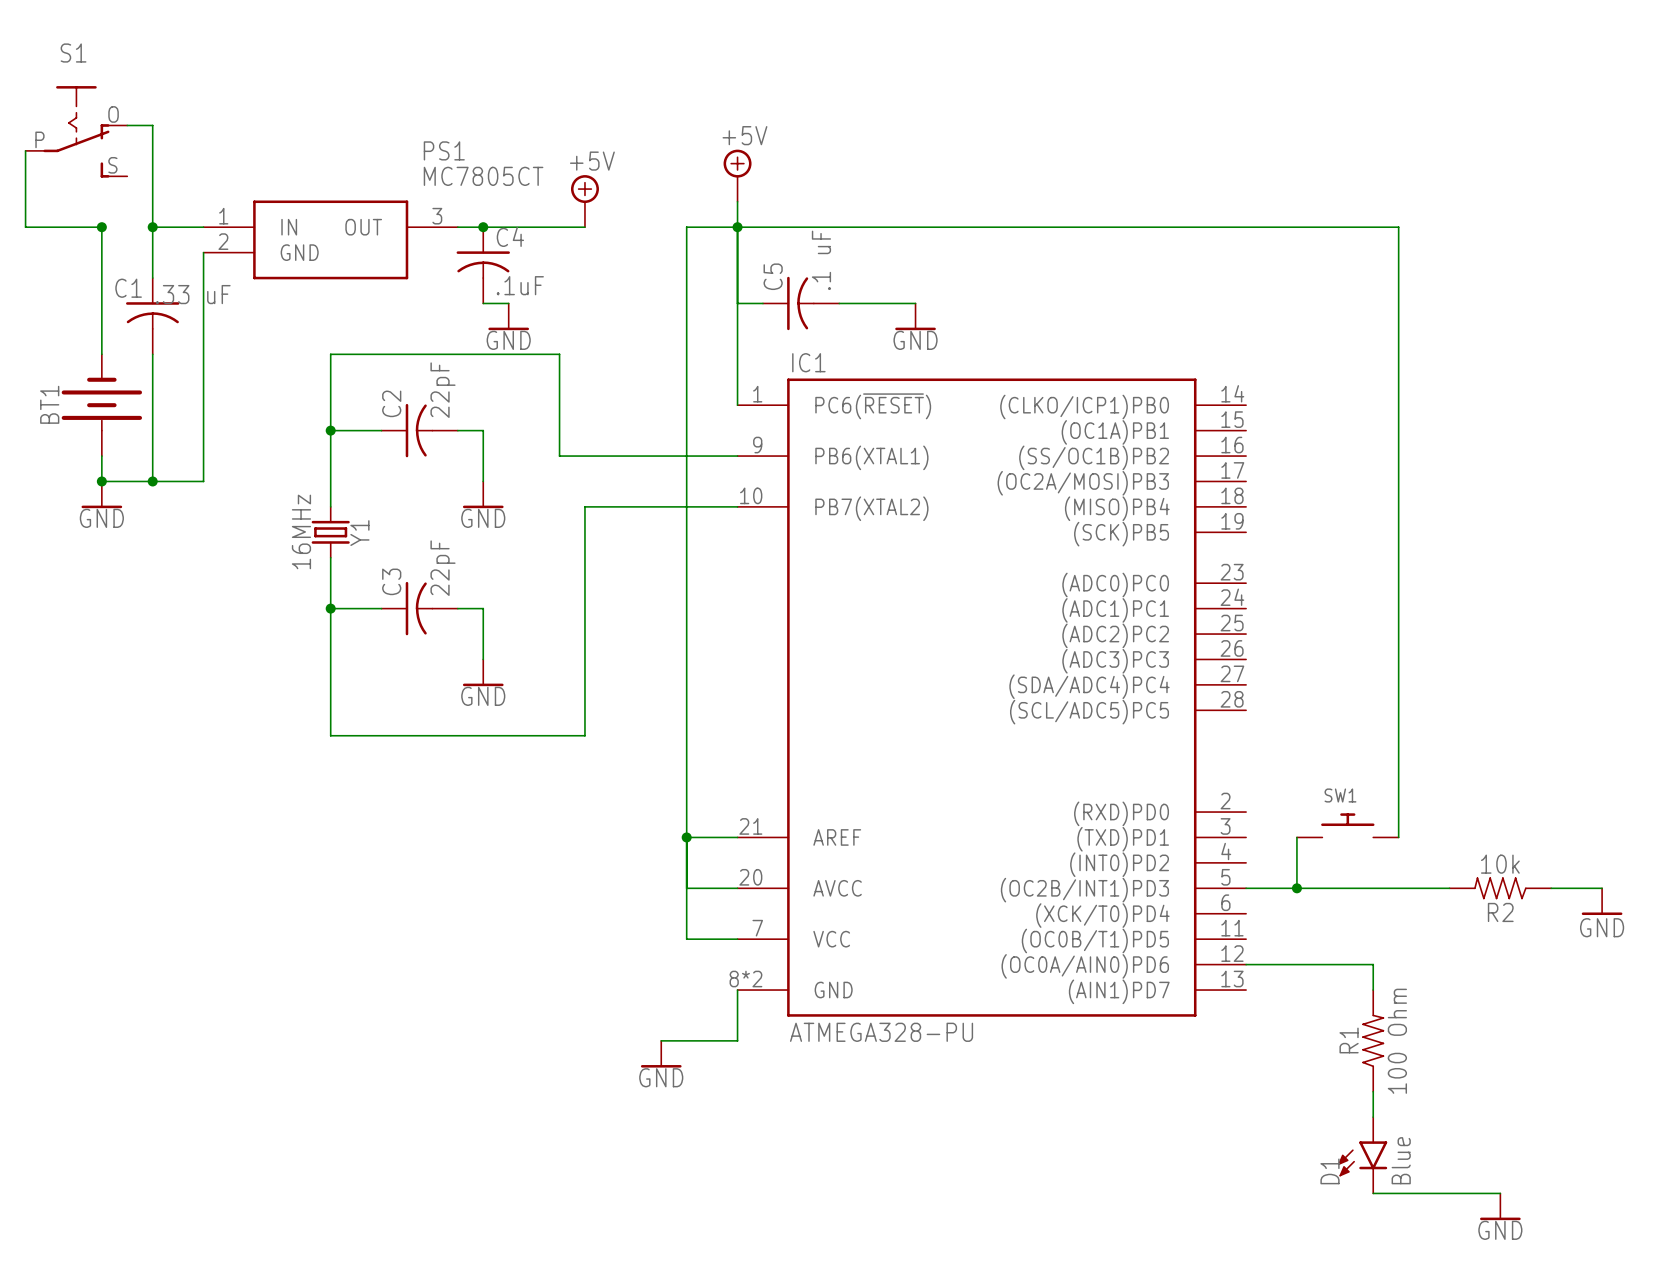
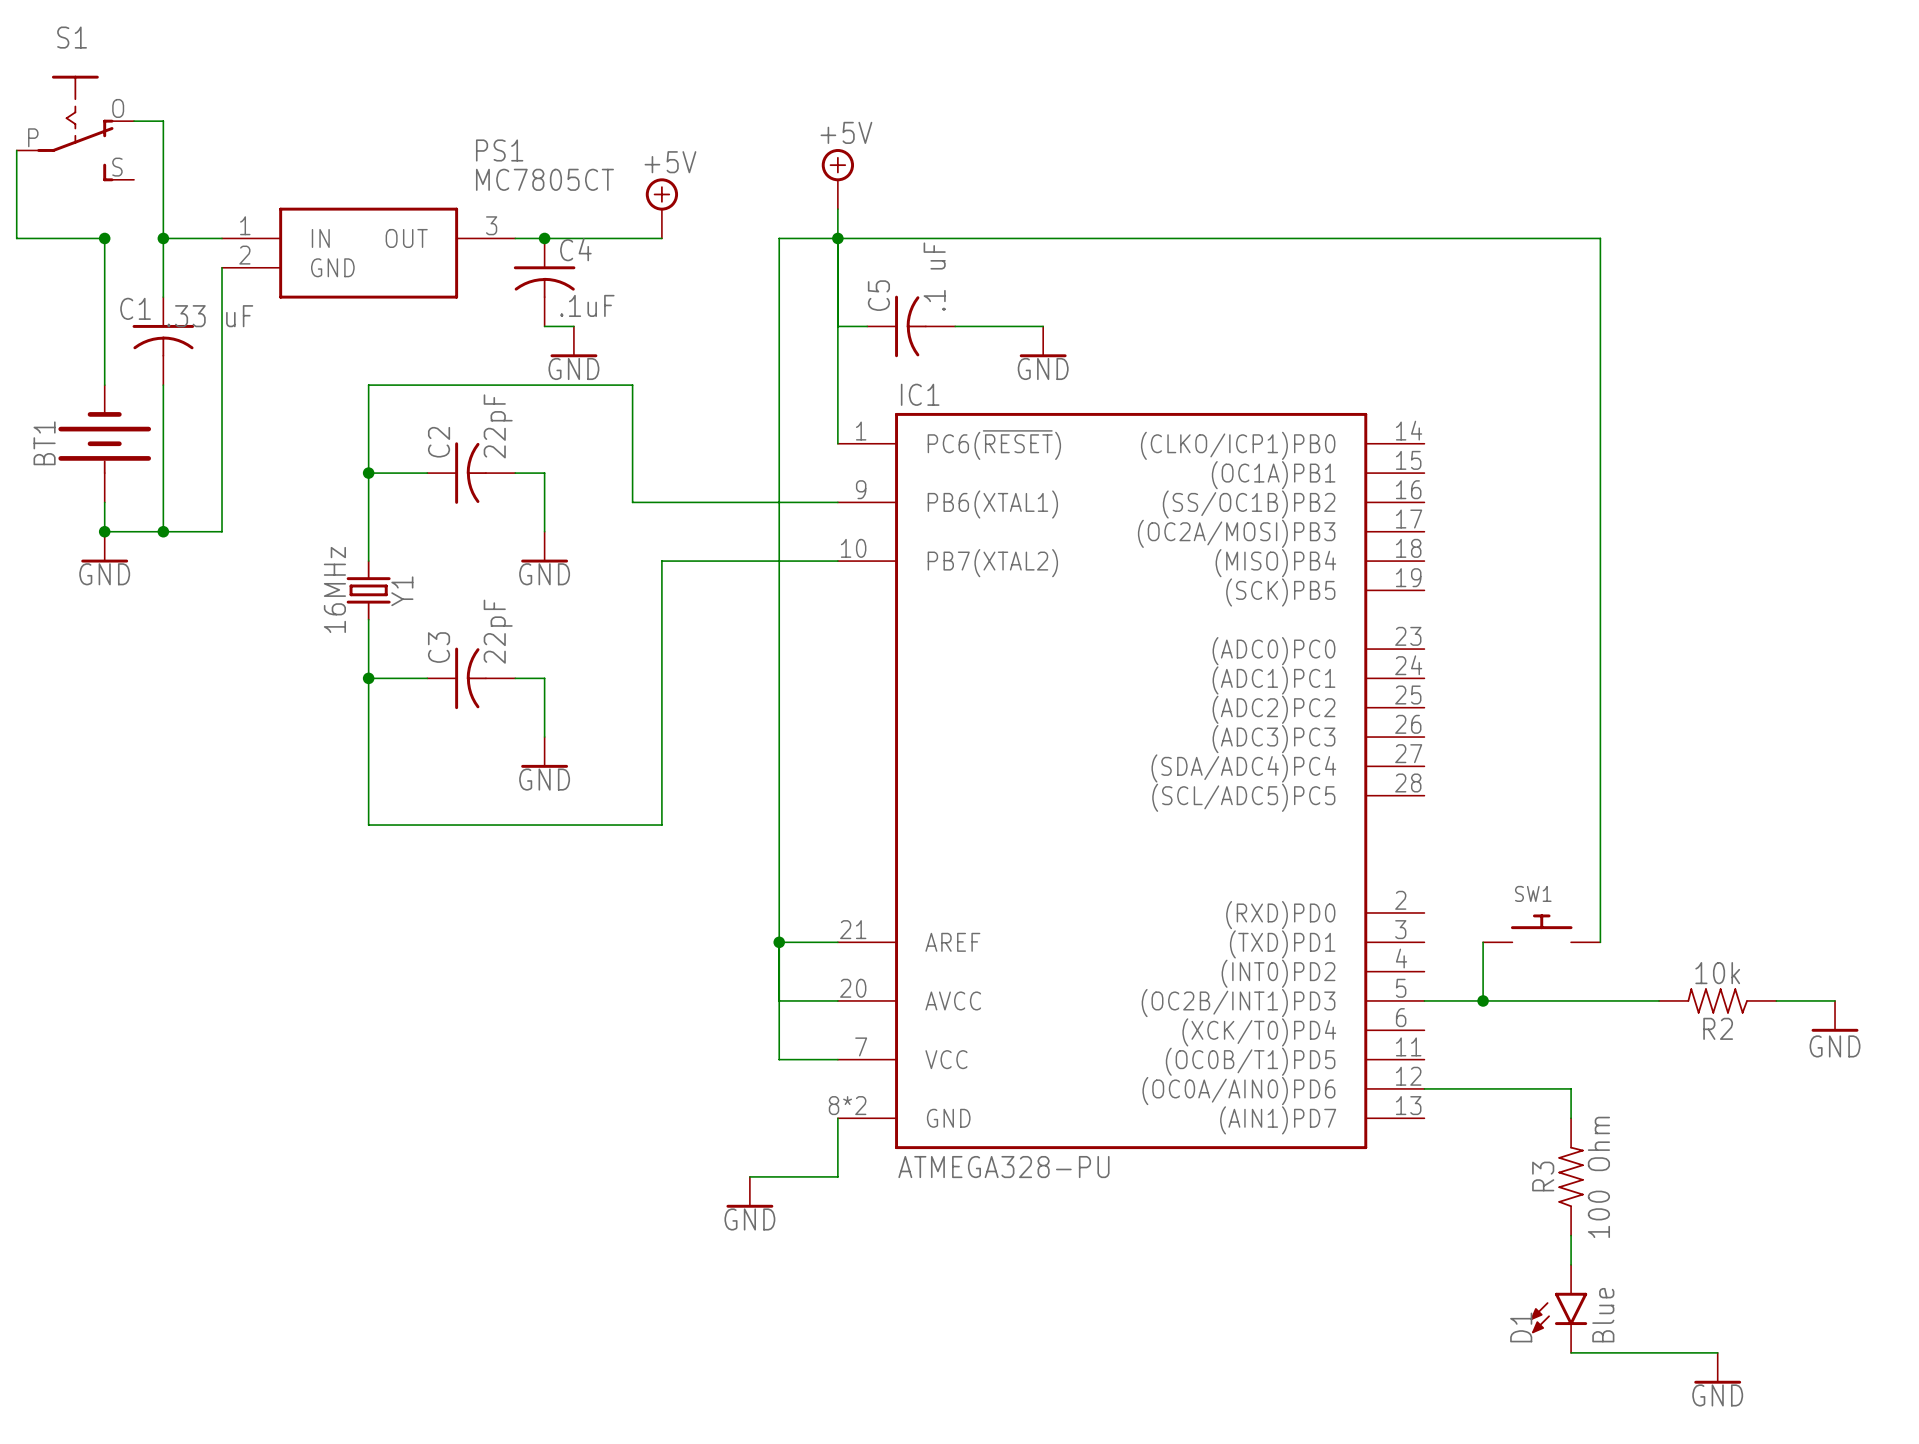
R1 name: R1 (1349, 1040) -> R3 (1543, 1176)

